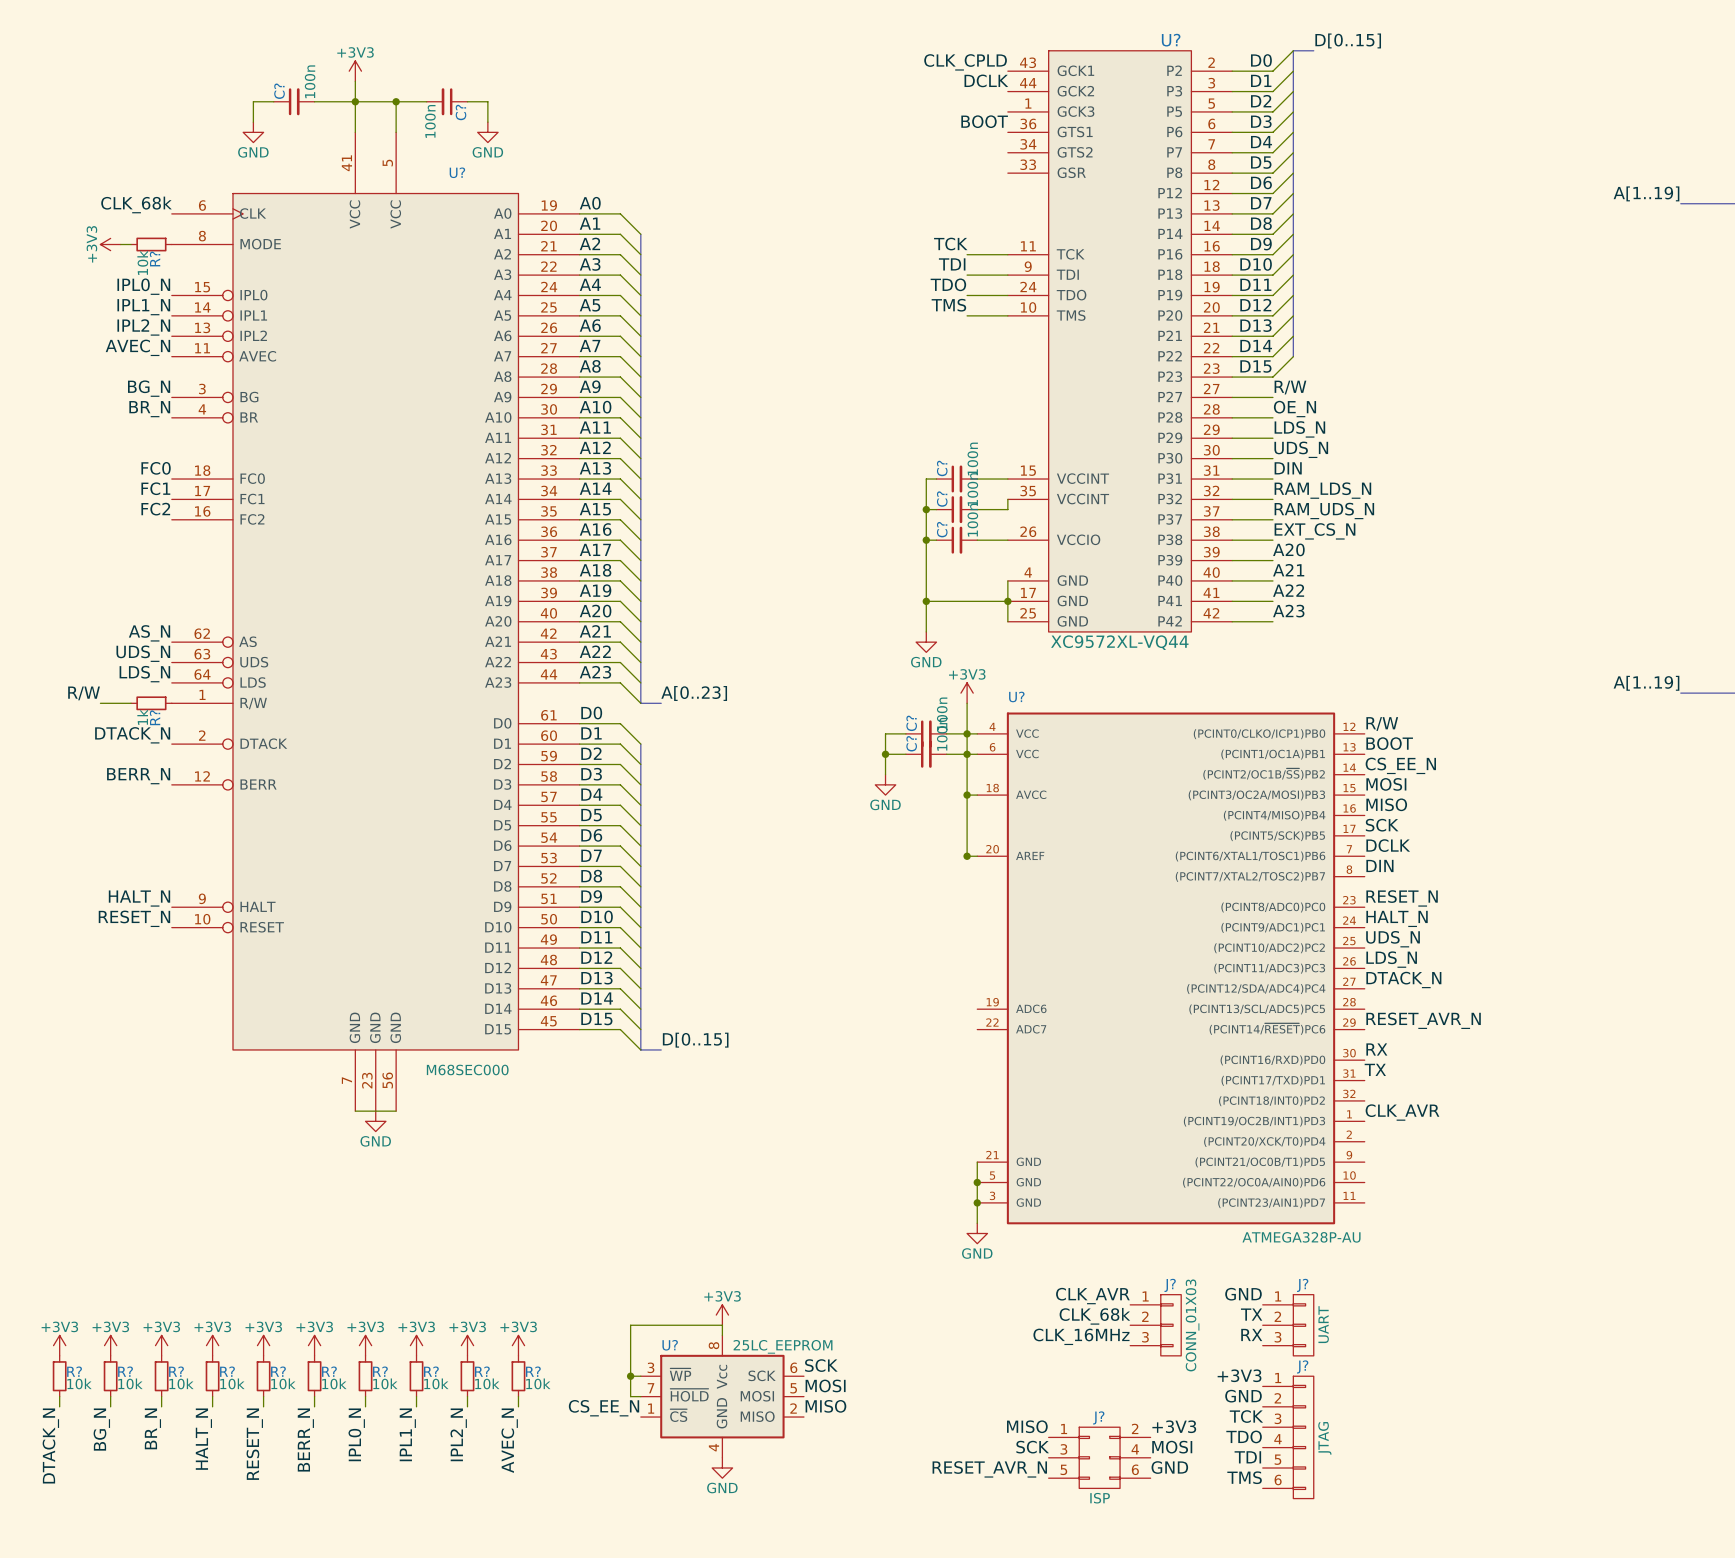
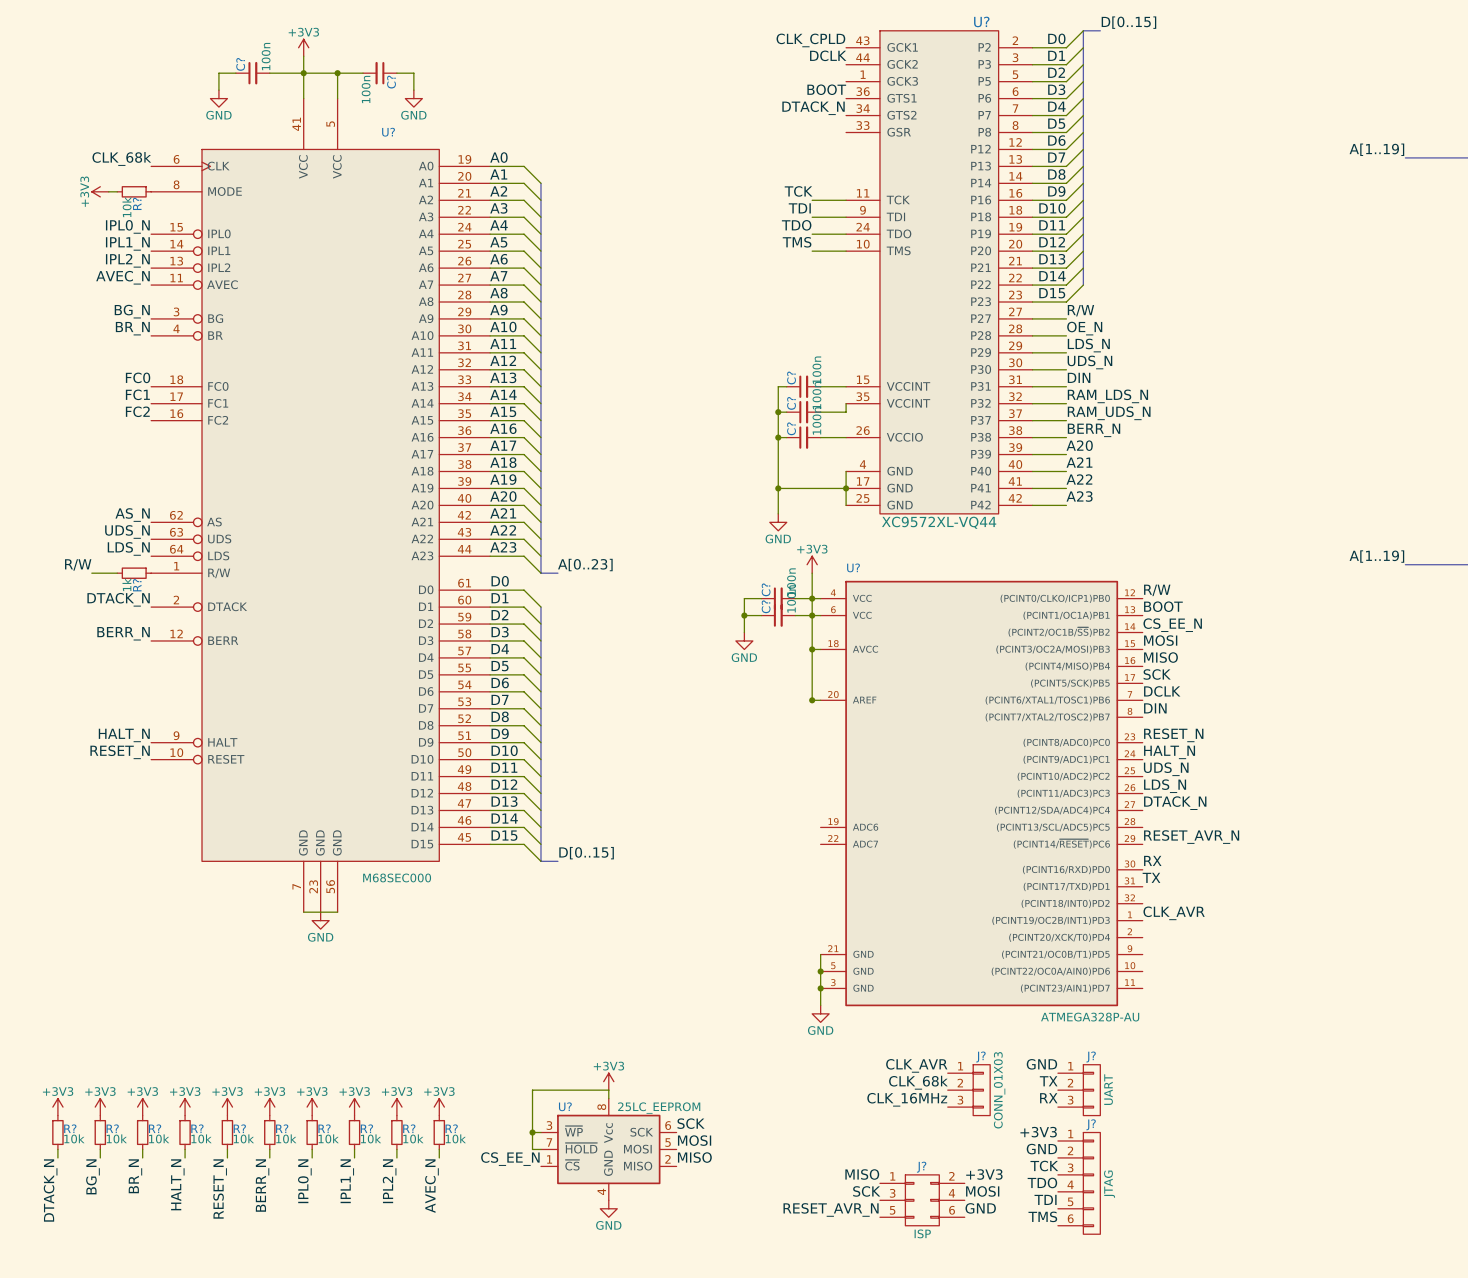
label: none -> DTACK_N (813, 108)
label: EXT_CS_N (1314, 531) -> BERR_N (1094, 430)

